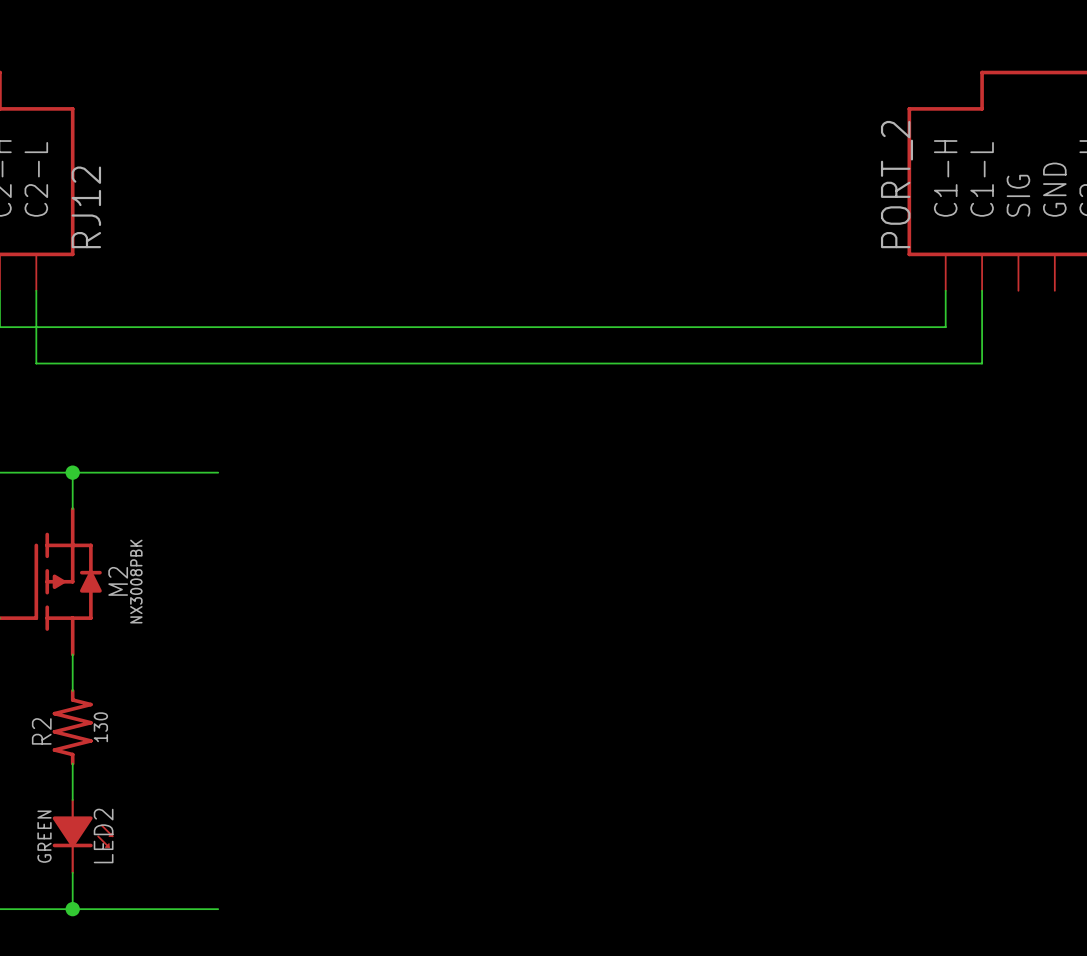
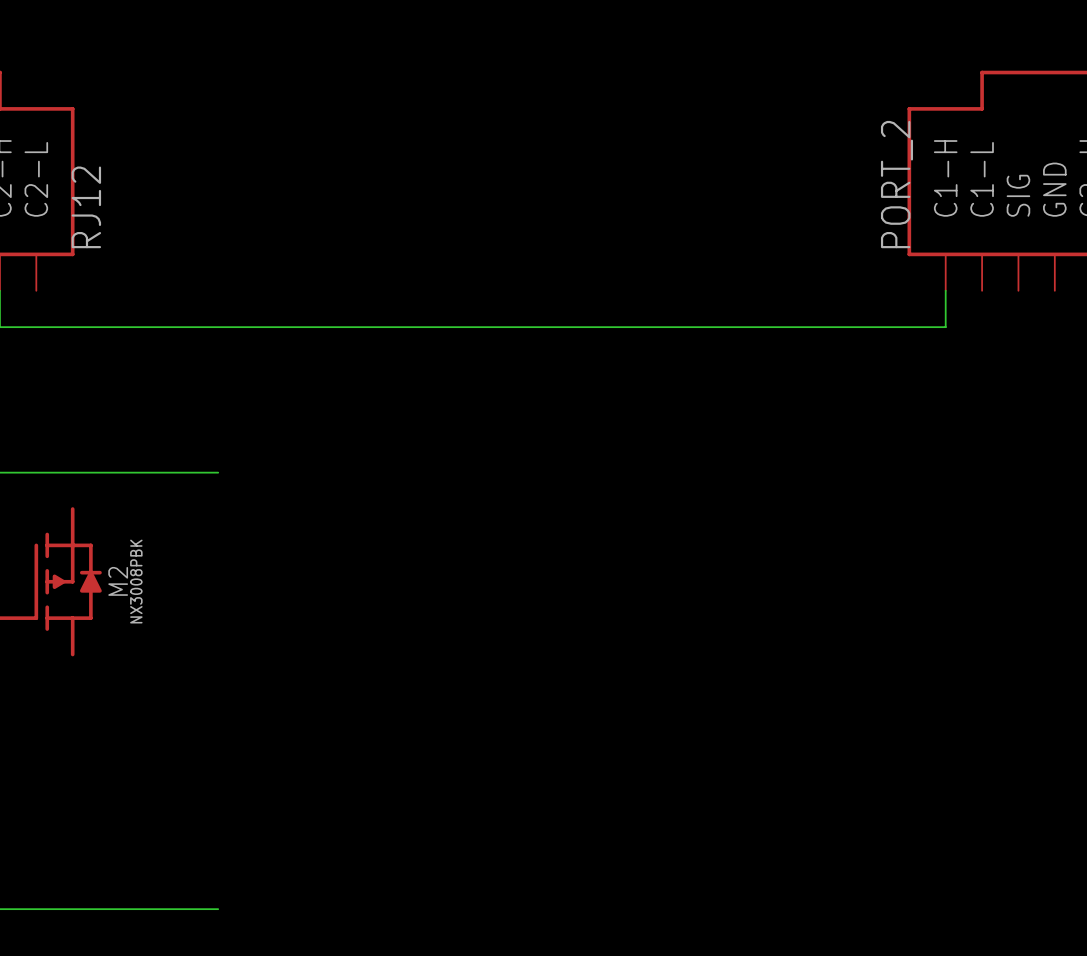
wire: (36, 290) (36, 363) (982, 363) (982, 290) -> none
wire: (72, 472) (72, 509) -> none
junction: (72, 472) -> none
wire: (72, 654) (72, 690) -> none
R2: 130 (72, 727) -> none
wire: (72, 763) (72, 800) -> none
LED2: GREEN (82, 836) -> none
wire: (72, 872) (72, 909) -> none
junction: (72, 909) -> none

